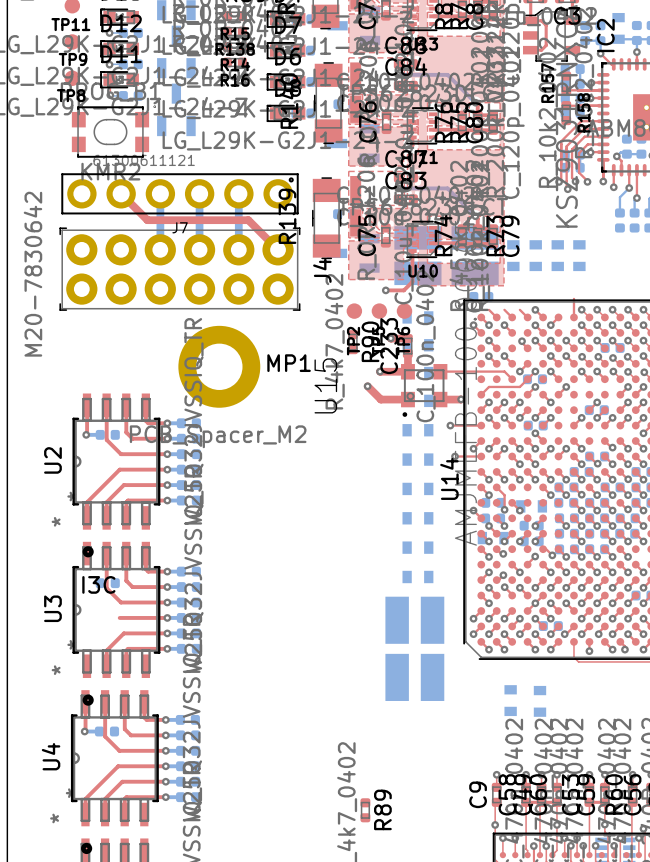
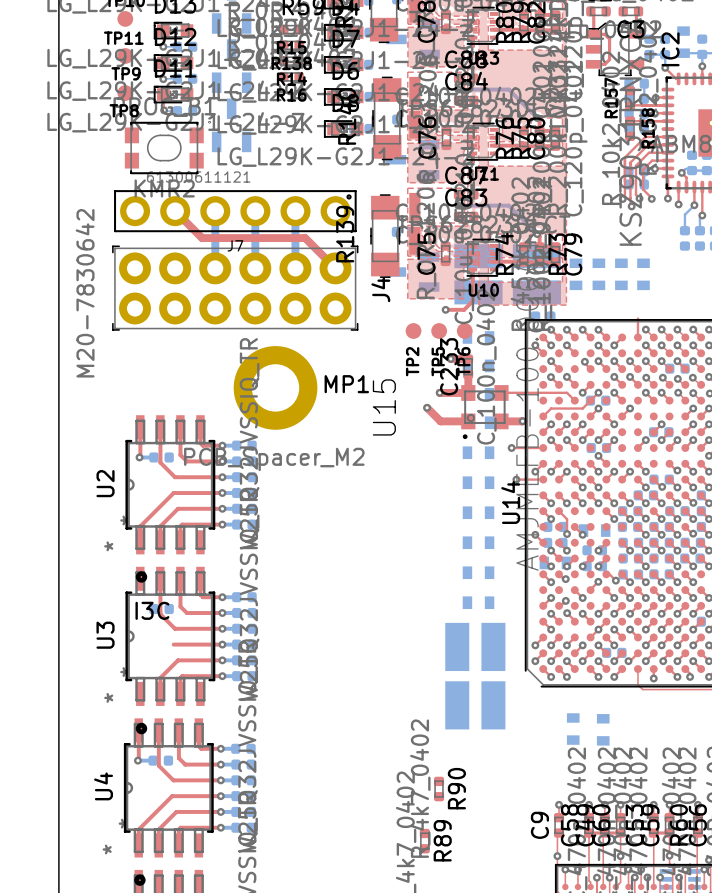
via: none -> (551, 329)
via: none -> (566, 329)
via: none -> (582, 329)
R90 position: (353, 342) -> (439, 789)

